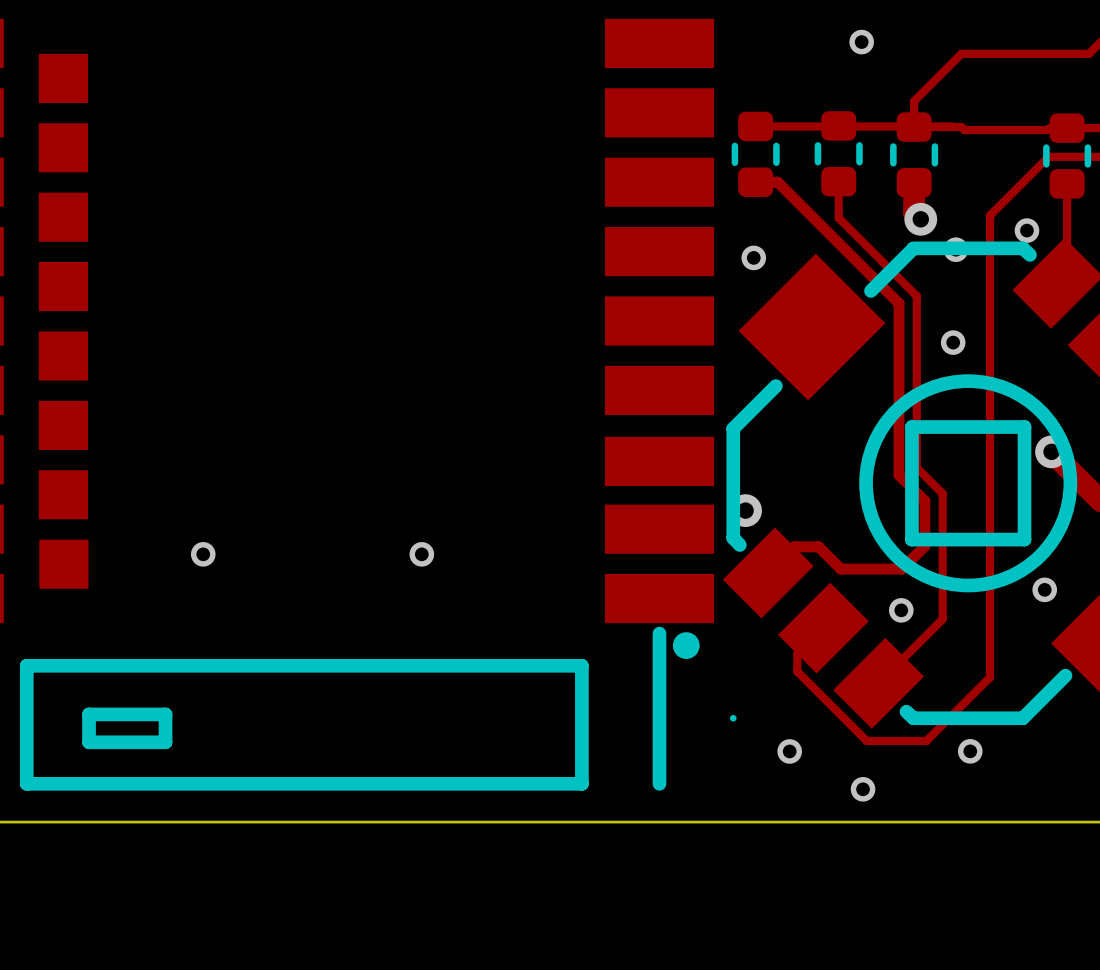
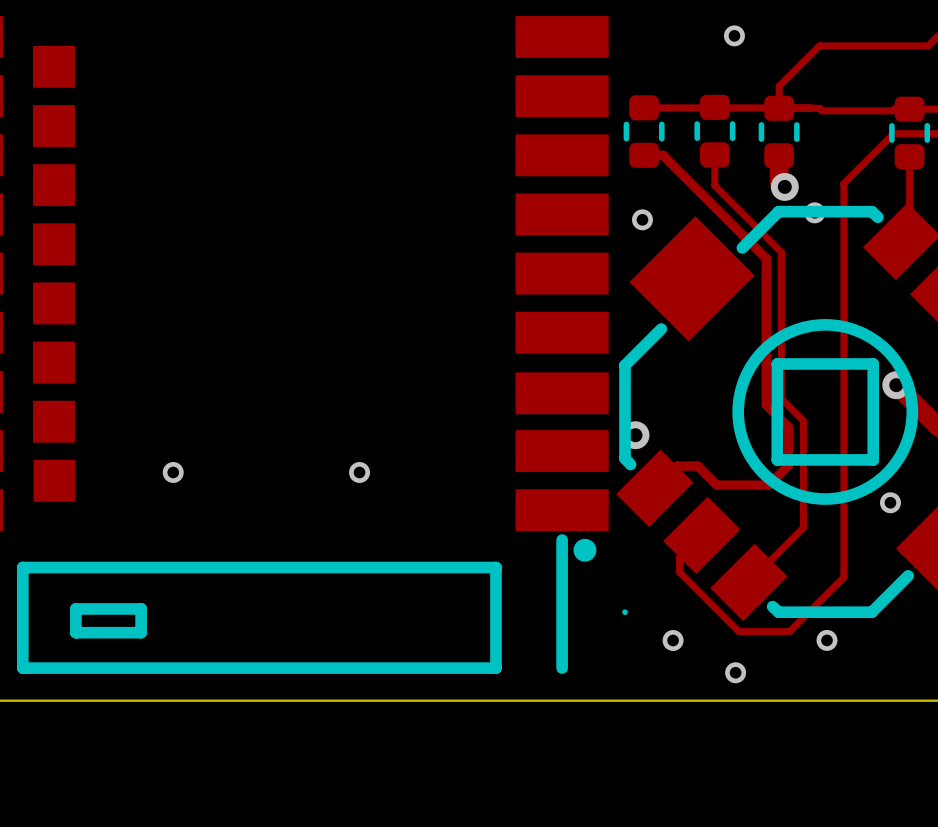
via: (1026, 230) -> none
via: (953, 342) -> none
via: (901, 610) -> none

